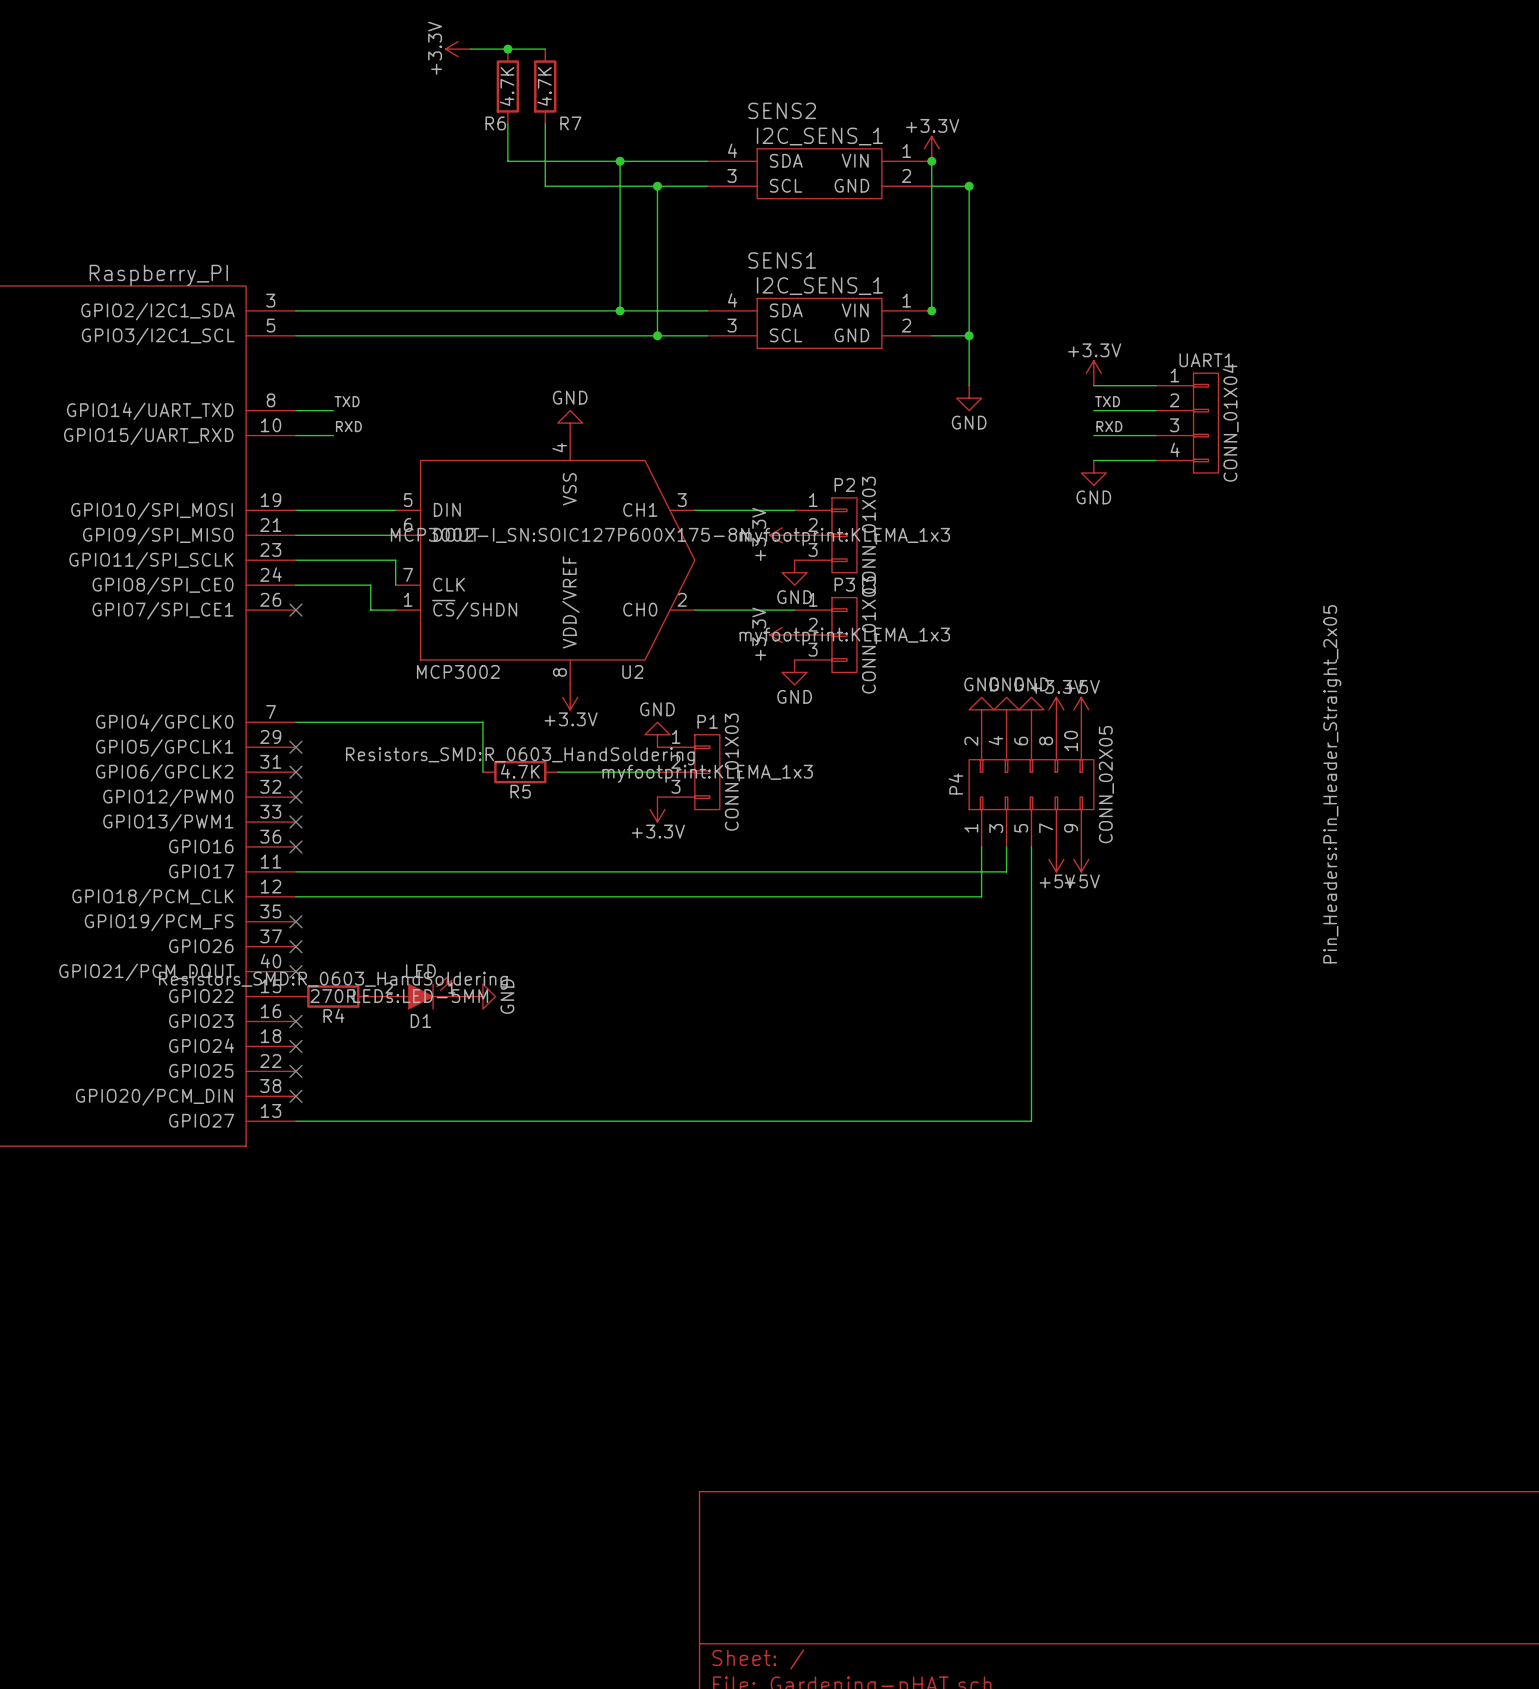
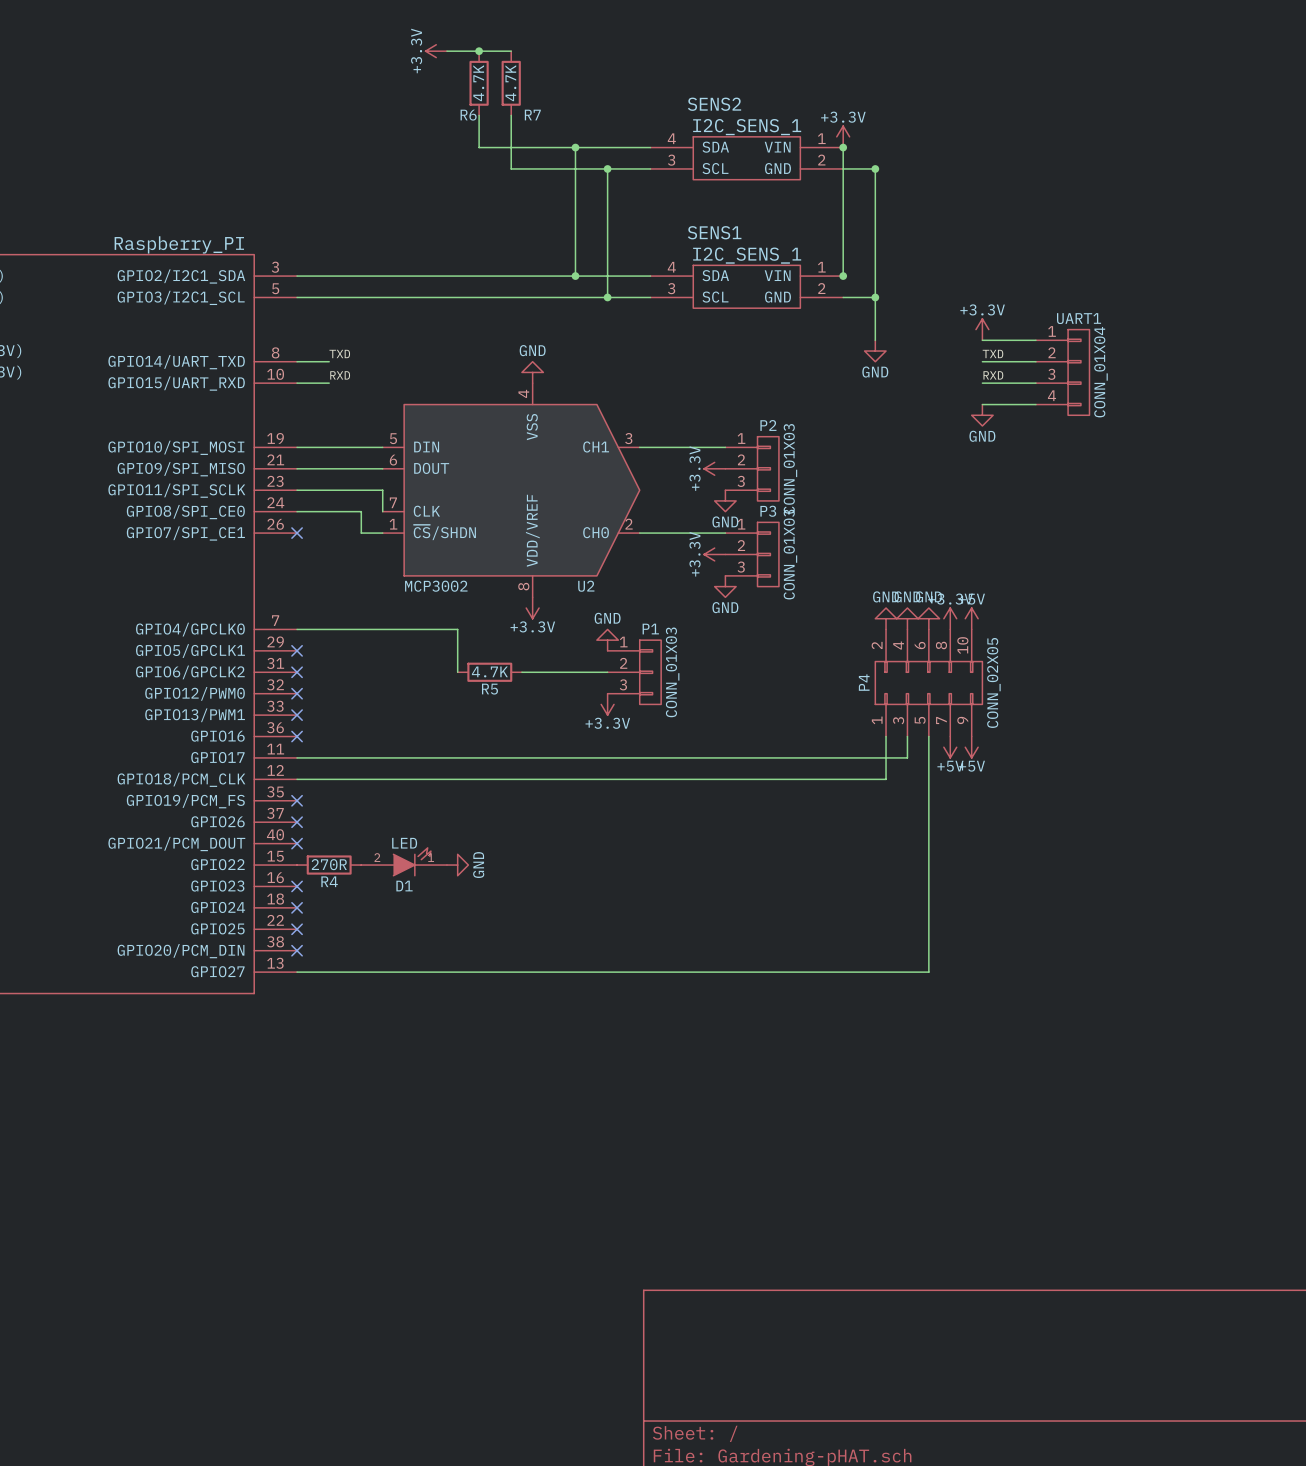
U2 text: MCP3002-I_SN:SOIC127P600X175-8N (570, 535) -> none
P2 text: myfootprint:KLEMA_1x3 (844, 536) -> none
P3 text: myfootprint:KLEMA_1x3 (844, 636) -> none
R5 text: Resistors_SMD:R_0603_HandSoldering (520, 756) -> none
P1 text: myfootprint:KLEMA_1x3 (707, 773) -> none
P4 text: Pin_Headers:Pin_Header_Straight_2x05 (1332, 784) -> none
R4 text: Resistors_SMD:R_0603_HandSoldering (333, 980) -> none
D1 text: LEDs:LED-5MM (420, 996) -> none

